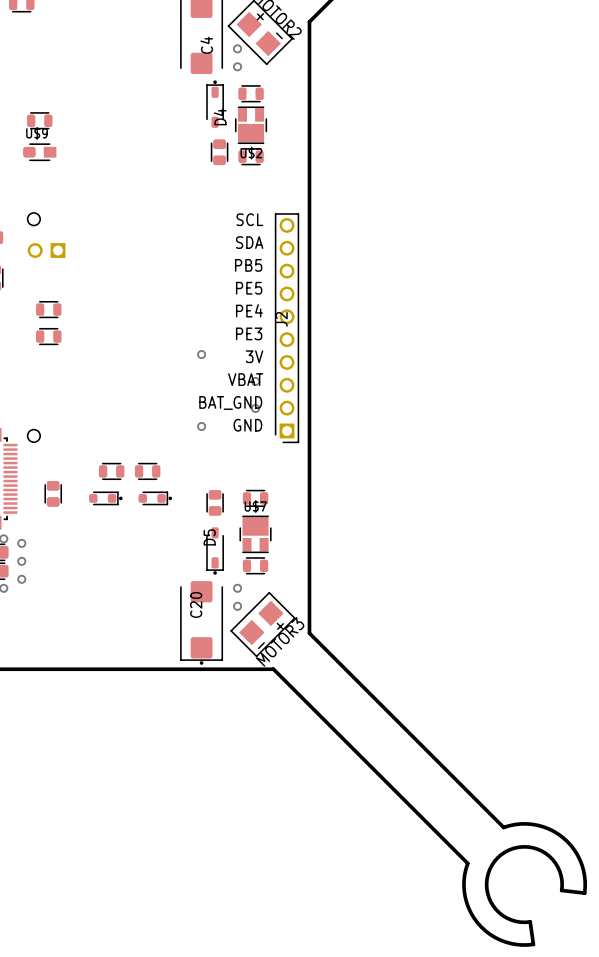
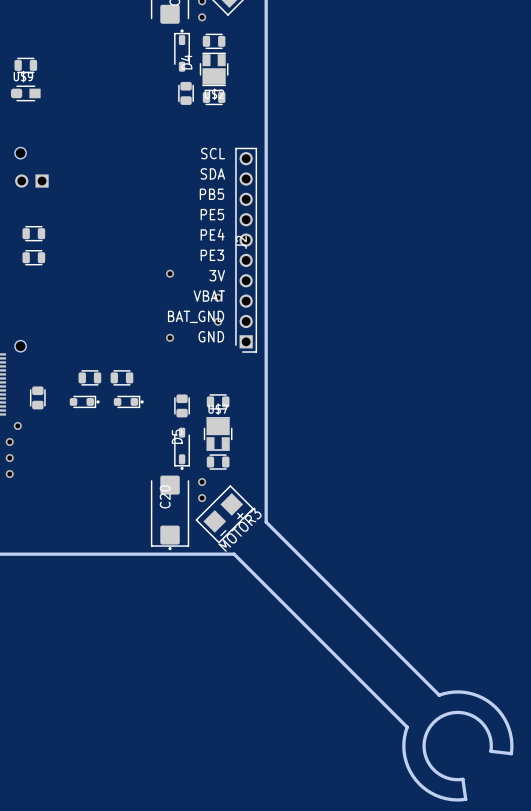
via: none -> (17, 425)

